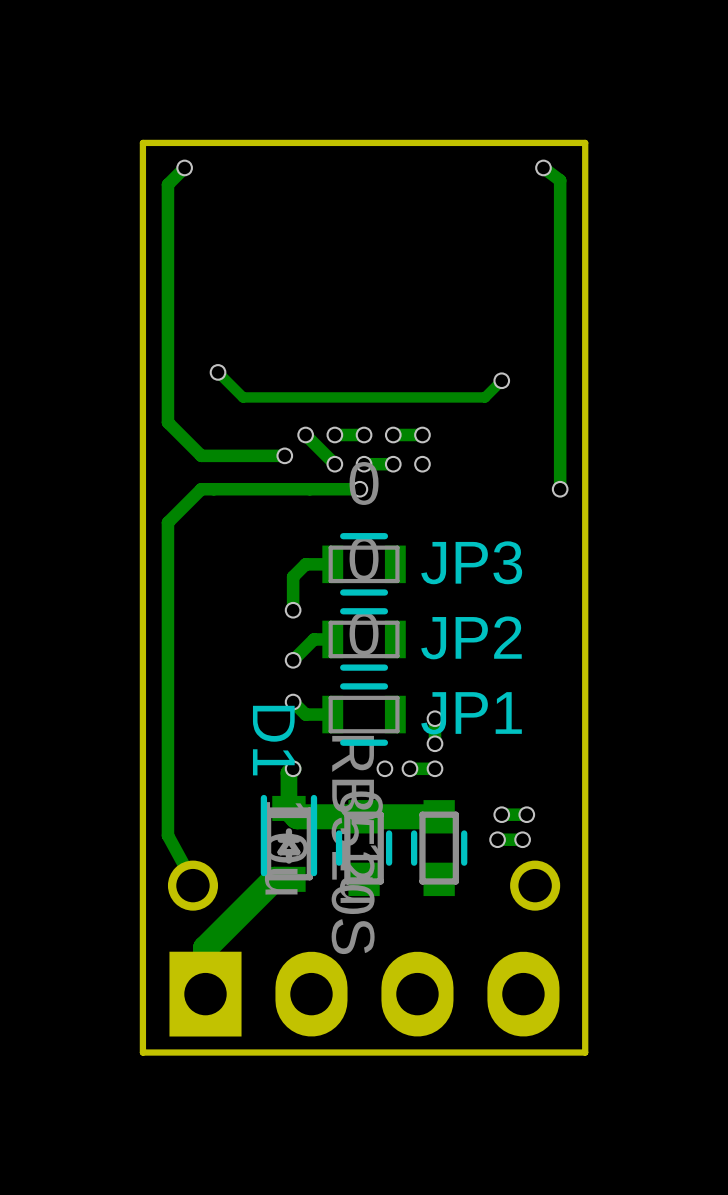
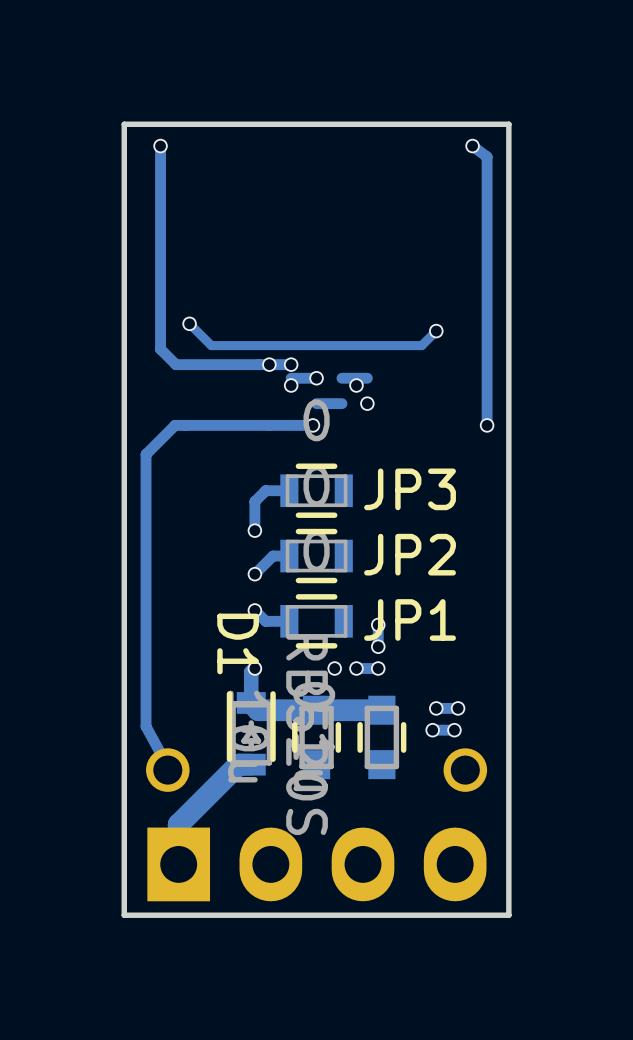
track: (184, 167) (167, 184) (167, 422) (201, 455) (284, 455) -> (160, 146) (160, 349) (175, 364) (291, 364)
via: none -> (291, 364)
track: (305, 434) (334, 464) -> none
via position: (305, 434) -> (269, 364)
via: (334, 434) -> none
via: (393, 434) -> none
via position: (422, 434) -> (356, 385)
via: none -> (291, 385)
via: (284, 455) -> none
via: (334, 464) -> none
via: (364, 464) -> none
via: (393, 464) -> none

